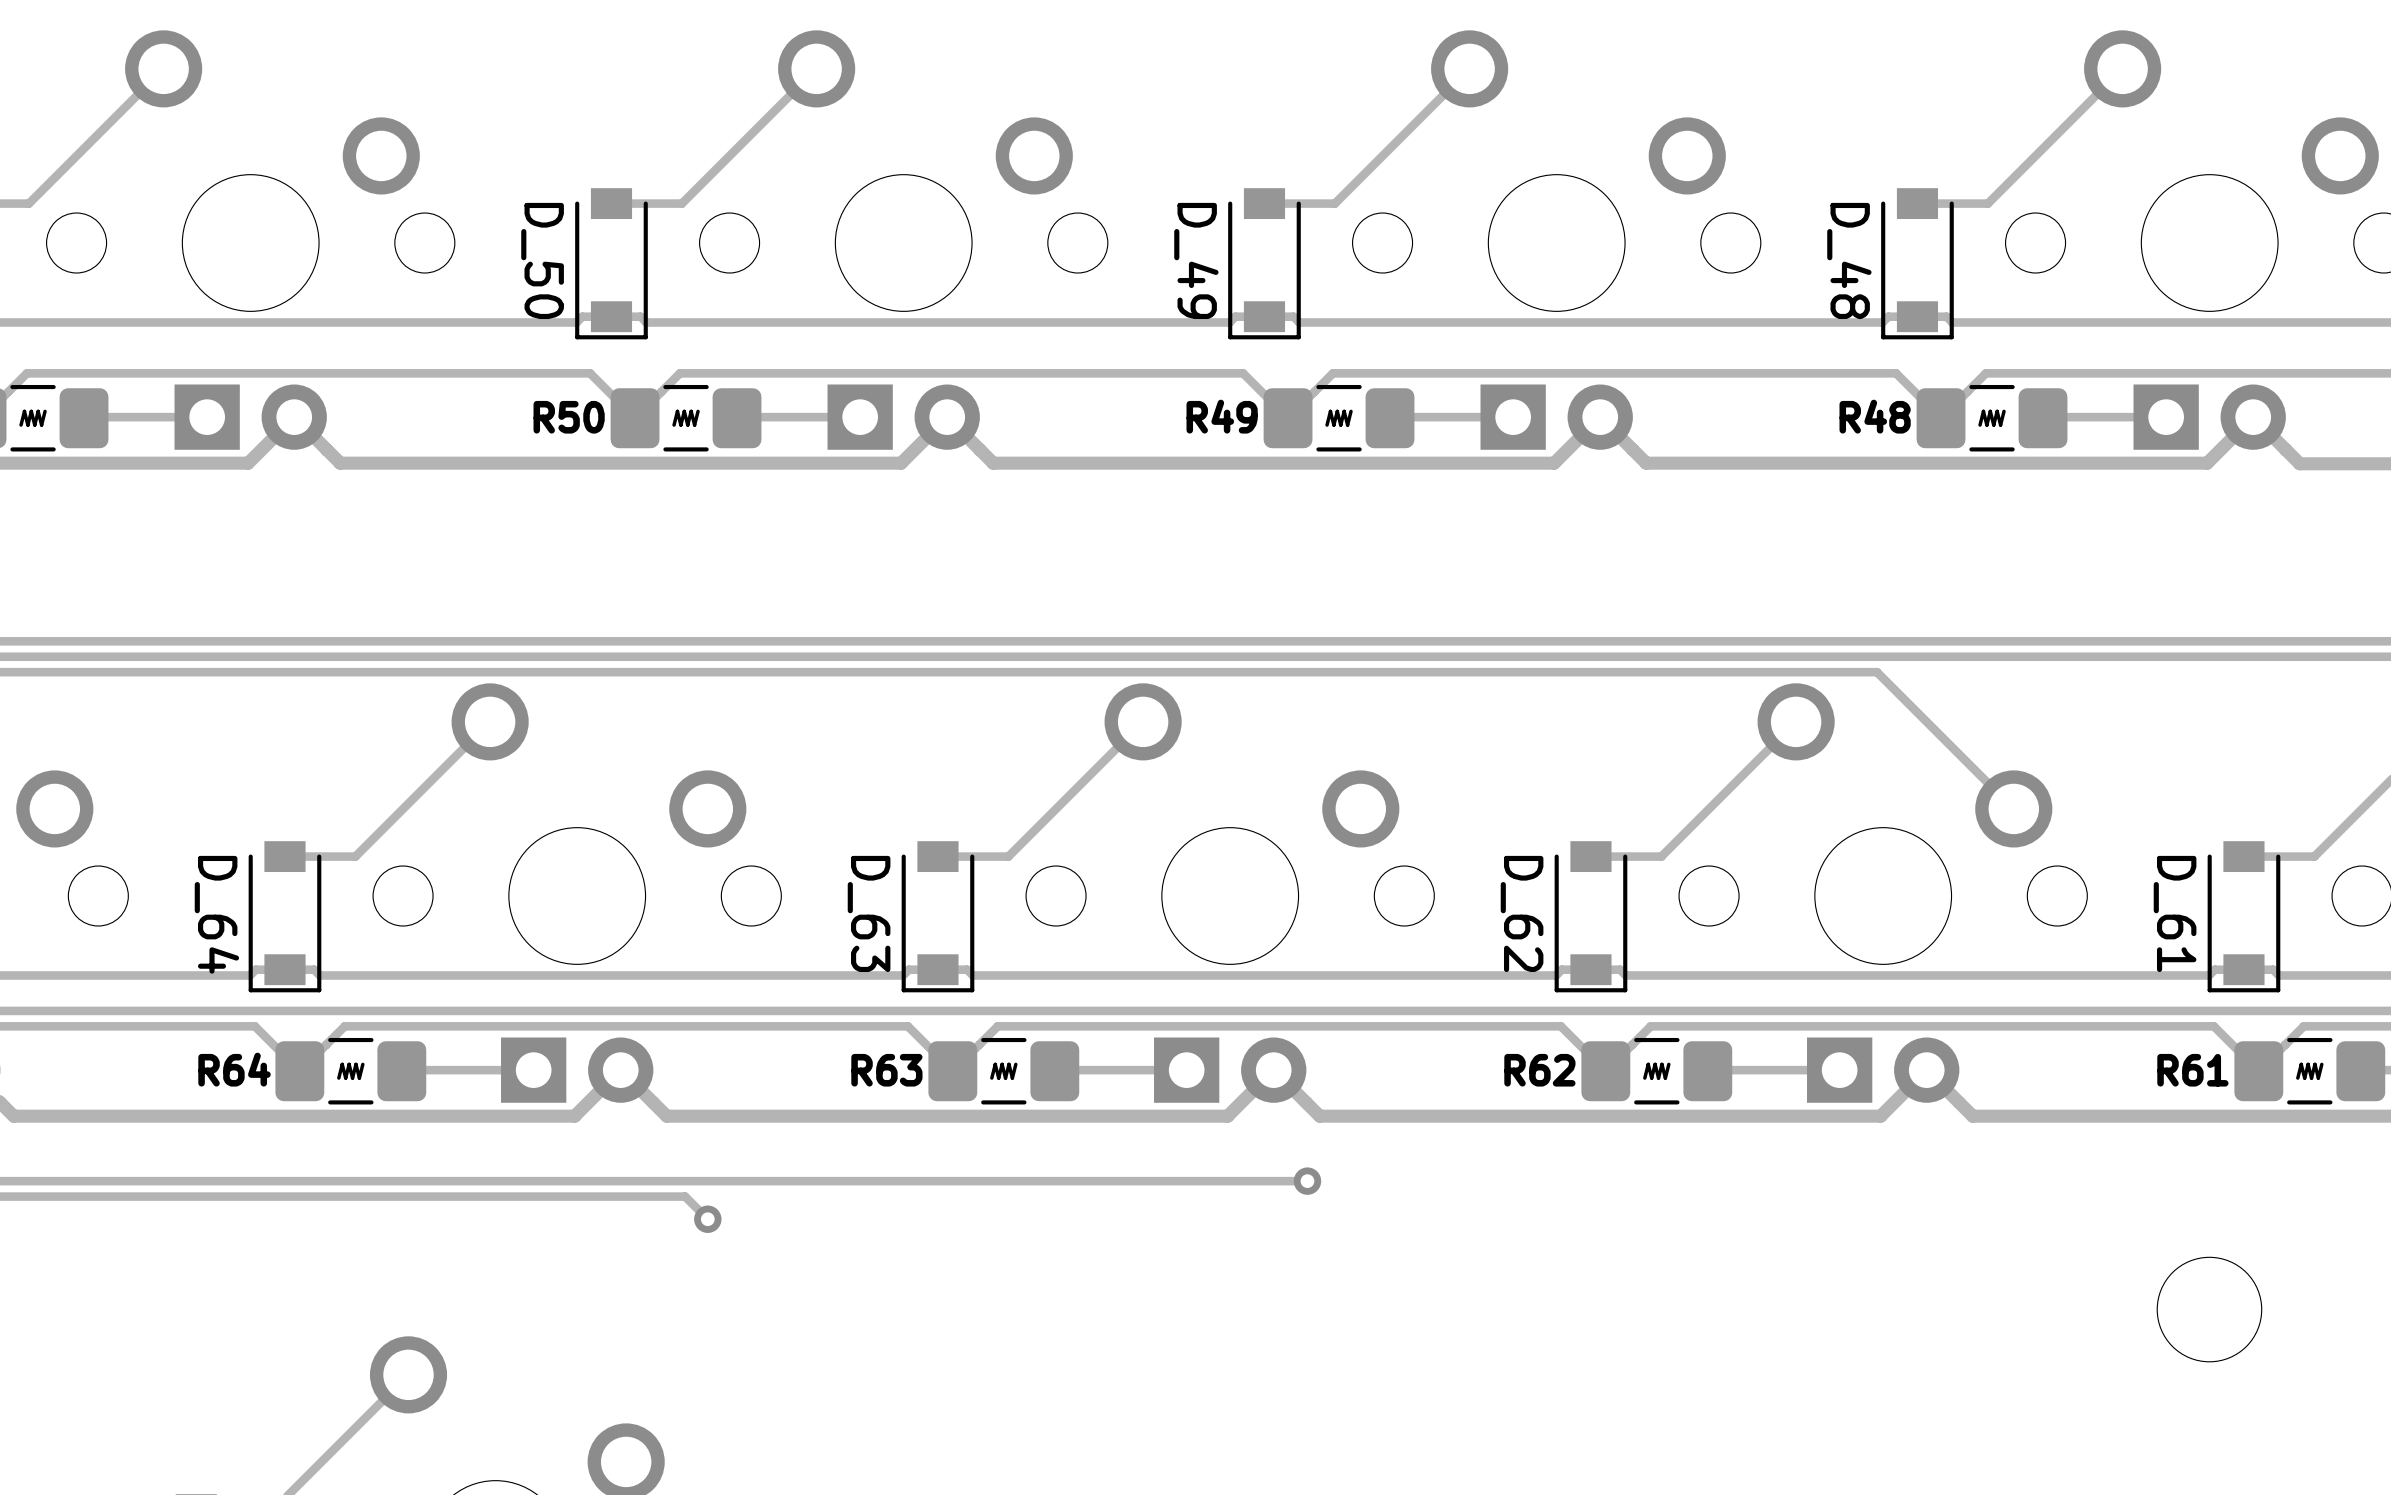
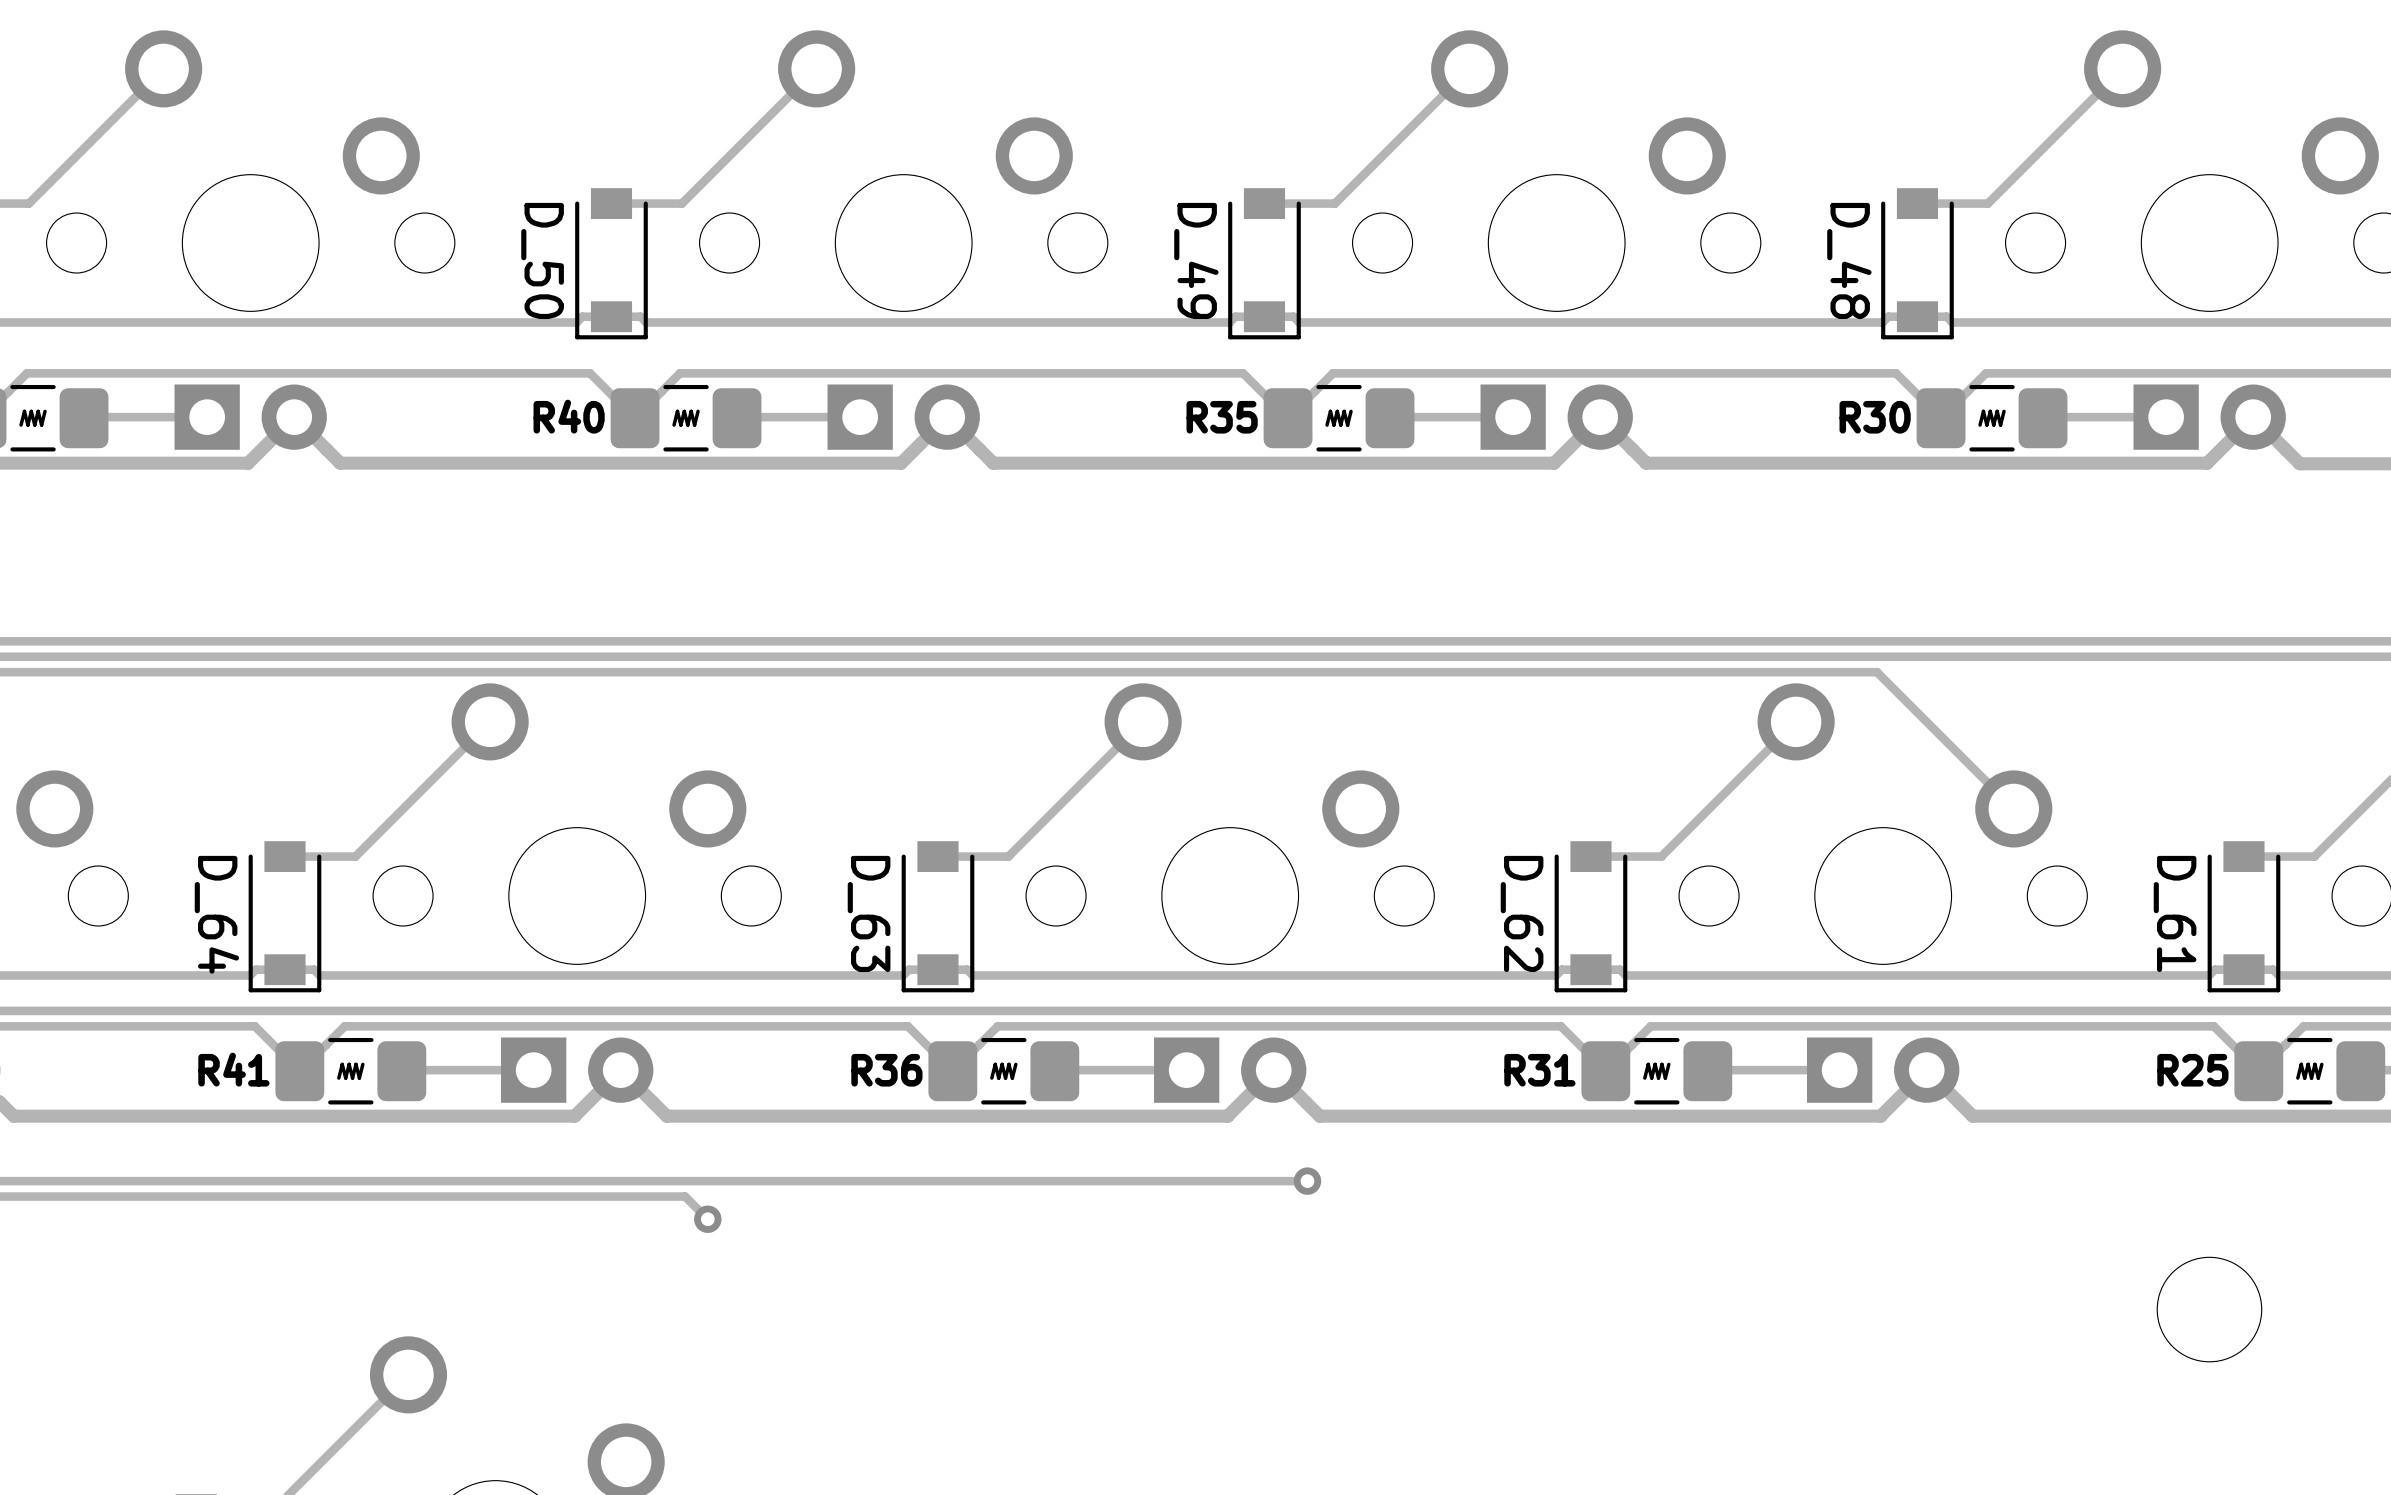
R49 name: R49 (1222, 416) -> R35 (1222, 417)
R48 name: R48 (1875, 416) -> R30 (1875, 417)
R50 name: R50 (569, 417) -> R40 (569, 416)
R64 name: R64 (234, 1069) -> R41 (233, 1069)
R63 name: R63 (886, 1070) -> R36 (886, 1070)
R62 name: R62 (1539, 1070) -> R31 (1539, 1070)
R61 name: R61 (2192, 1070) -> R25 (2192, 1070)

